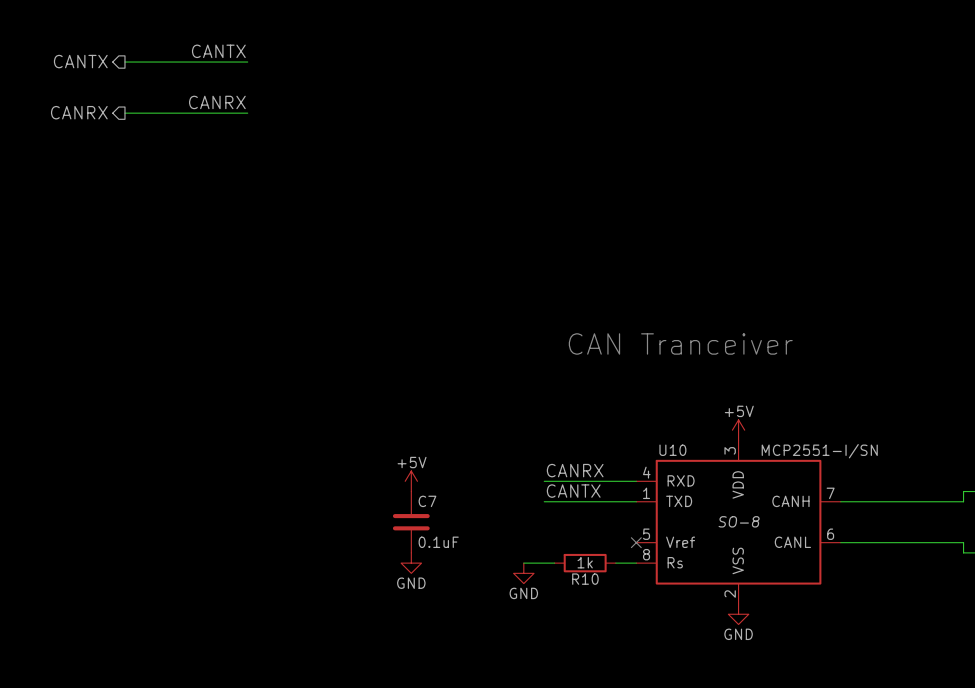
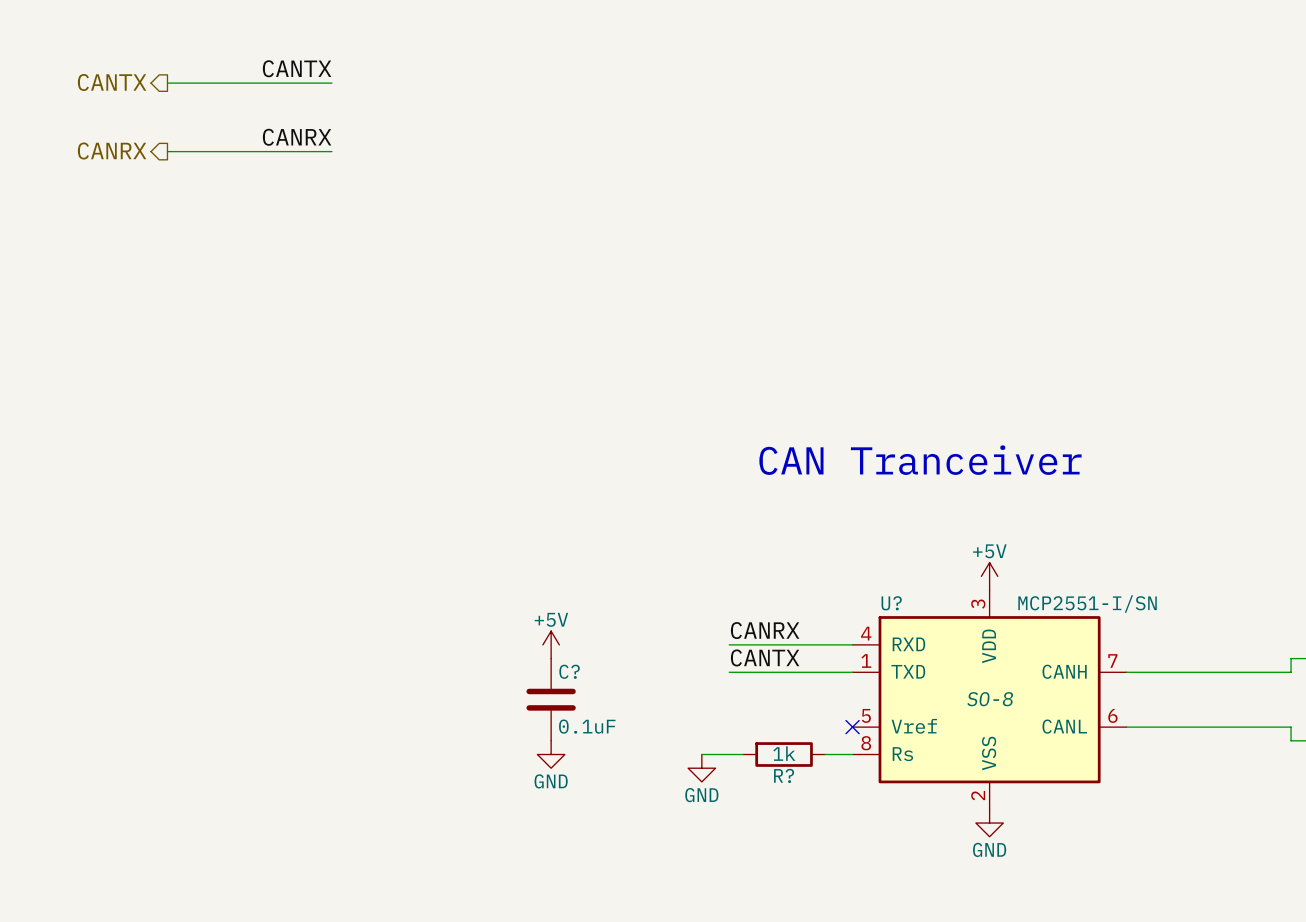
U10 name: U10 (672, 450) -> U? (891, 603)
C7 name: C7 (427, 501) -> C? (569, 671)
R10 name: R10 (585, 579) -> R? (784, 775)

